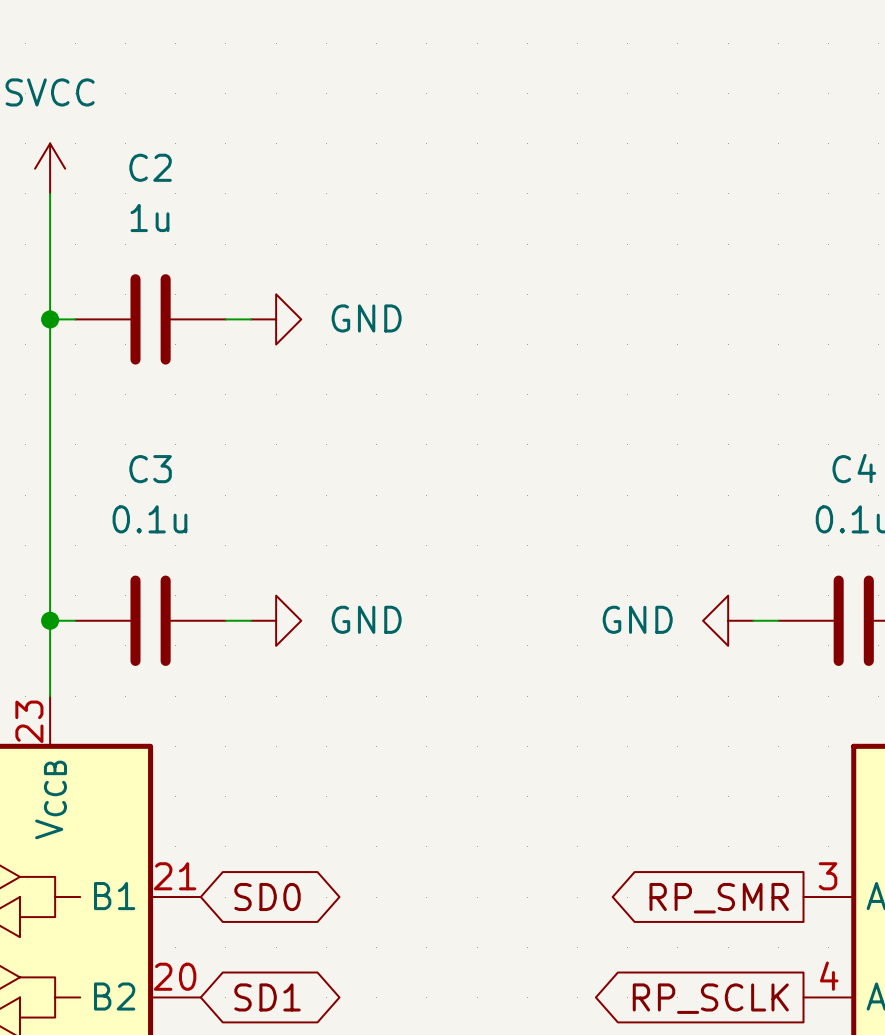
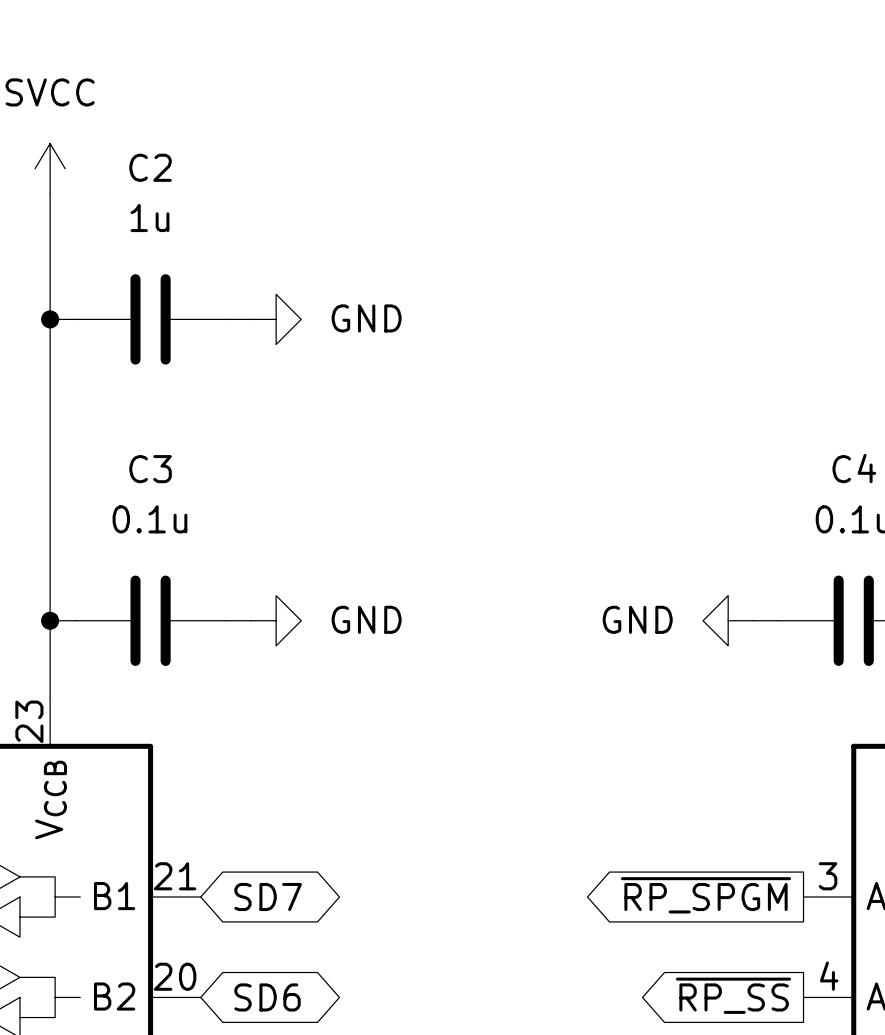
global label: SD0 (267, 897) -> SD7 (268, 897)
global label: RP_SMR (719, 898) -> ~{RP_SPGM} (706, 895)
global label: SD1 (267, 997) -> SD6 (267, 997)
global label: RP_SCLK (710, 998) -> ~{RP_SS} (733, 995)

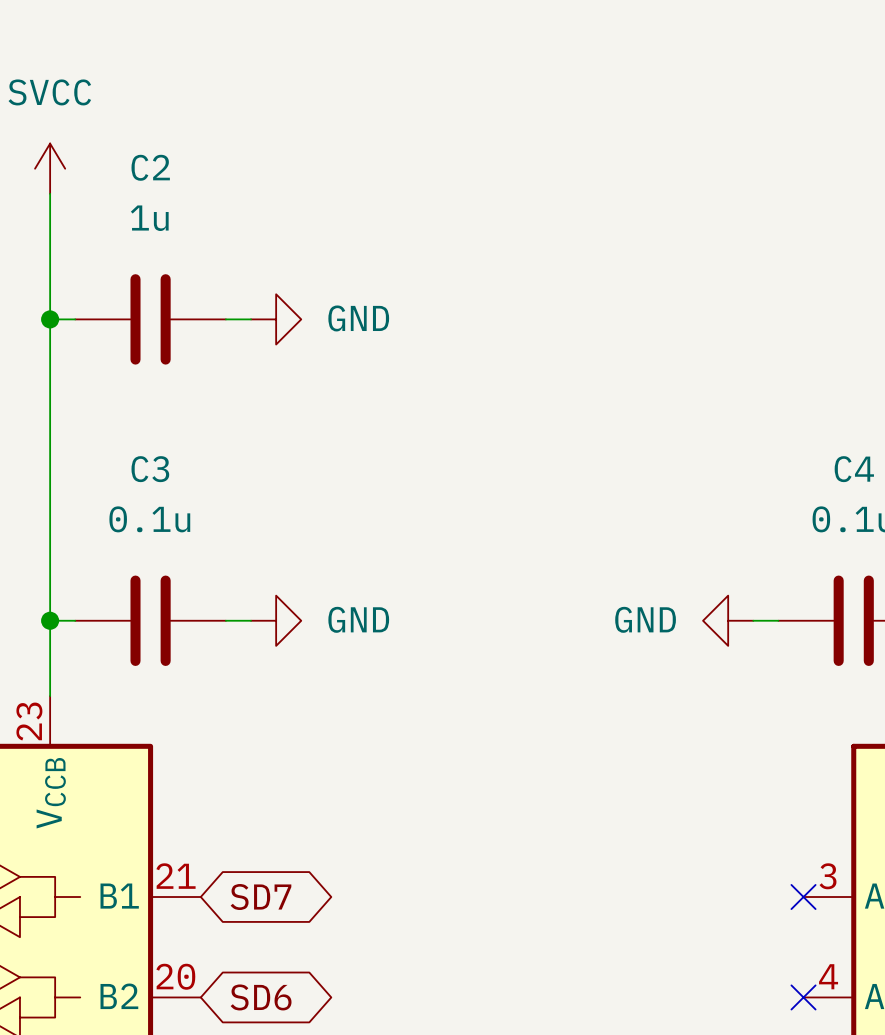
global label: ~{RP_SPGM} (706, 895) -> none
no-connect mark: none -> (803, 897)
global label: ~{RP_SS} (733, 995) -> none
no-connect mark: none -> (803, 997)

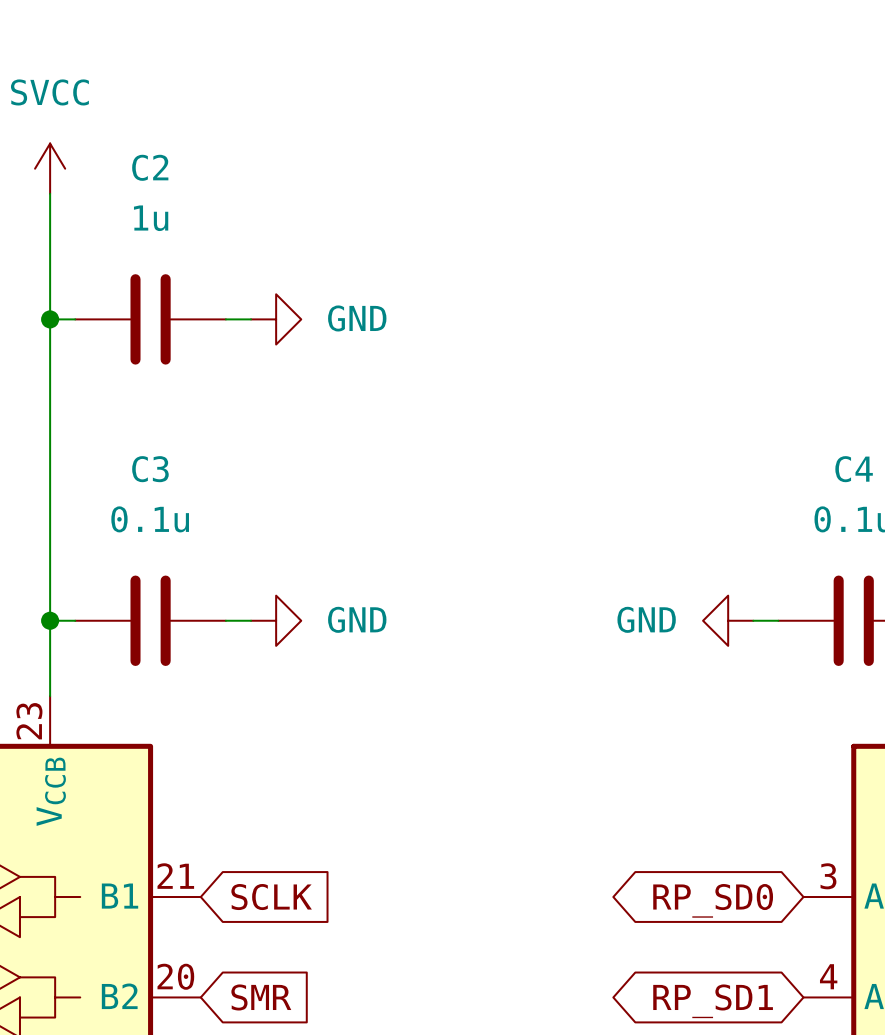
global label shape: bidirectional (261, 897) -> input (271, 897)
global label: SD7 (261, 897) -> SCLK (271, 897)
no-connect mark: (803, 897) -> none
global label: none -> RP_SD0 (713, 900)
global label shape: bidirectional (261, 997) -> input (261, 997)
global label: SD6 (261, 997) -> SMR (261, 997)
no-connect mark: (803, 997) -> none
global label: none -> RP_SD1 (713, 1001)

